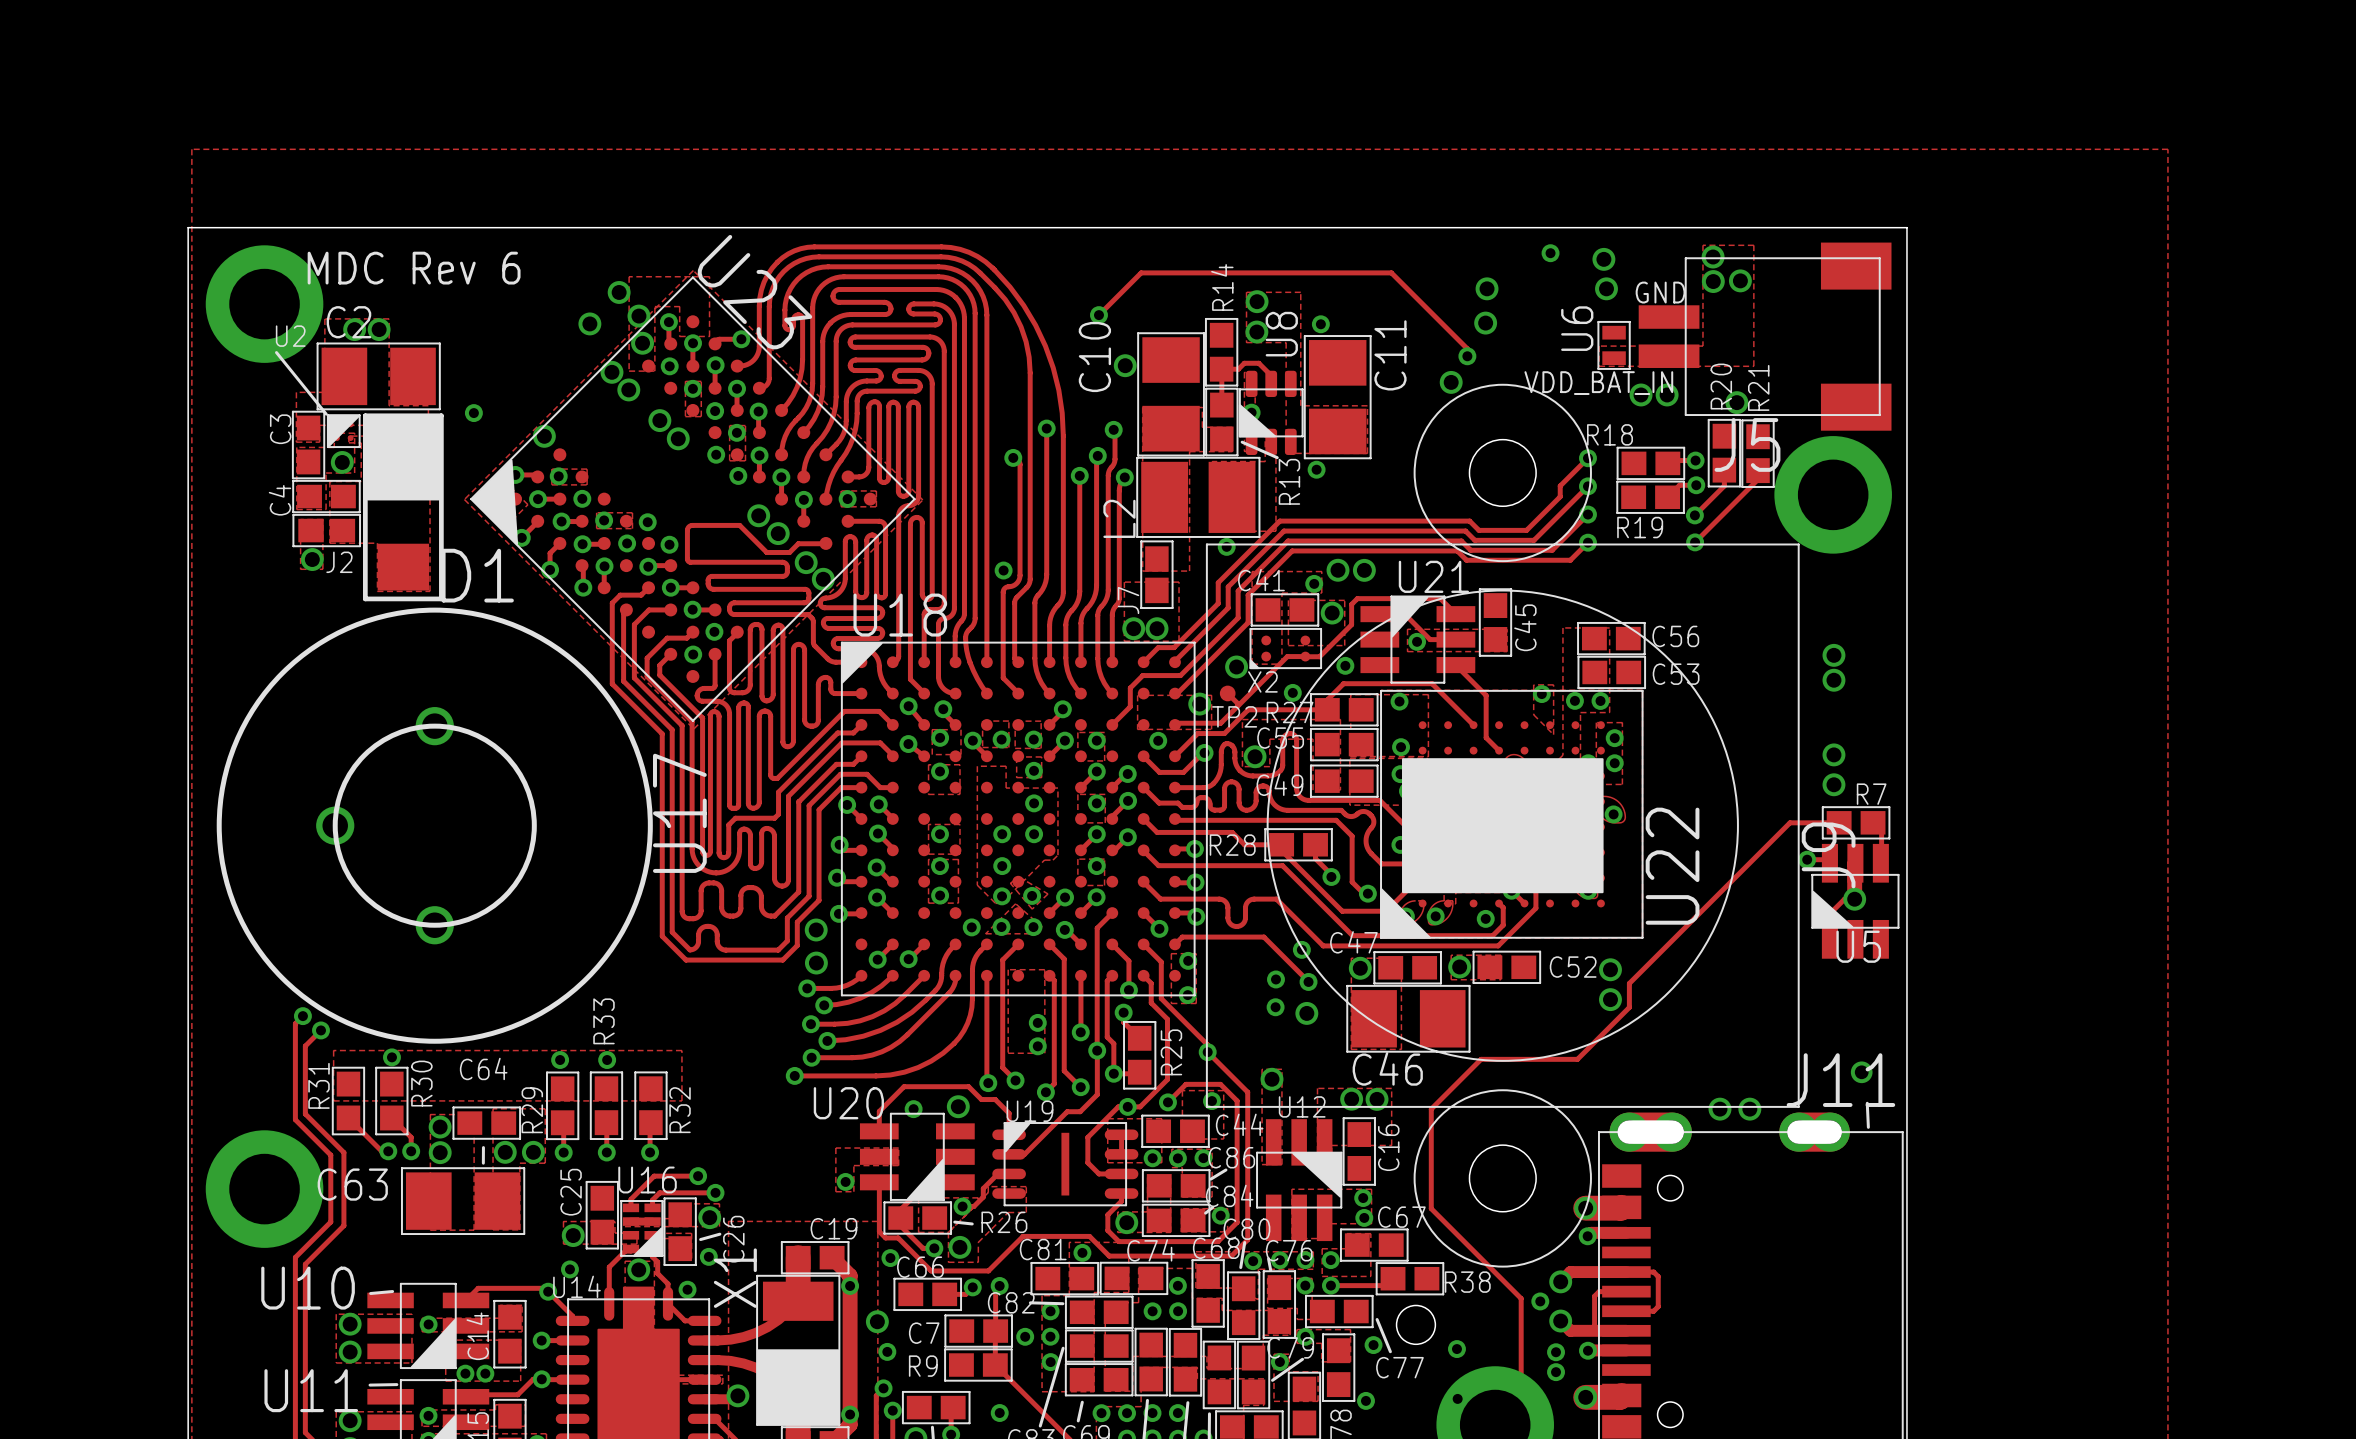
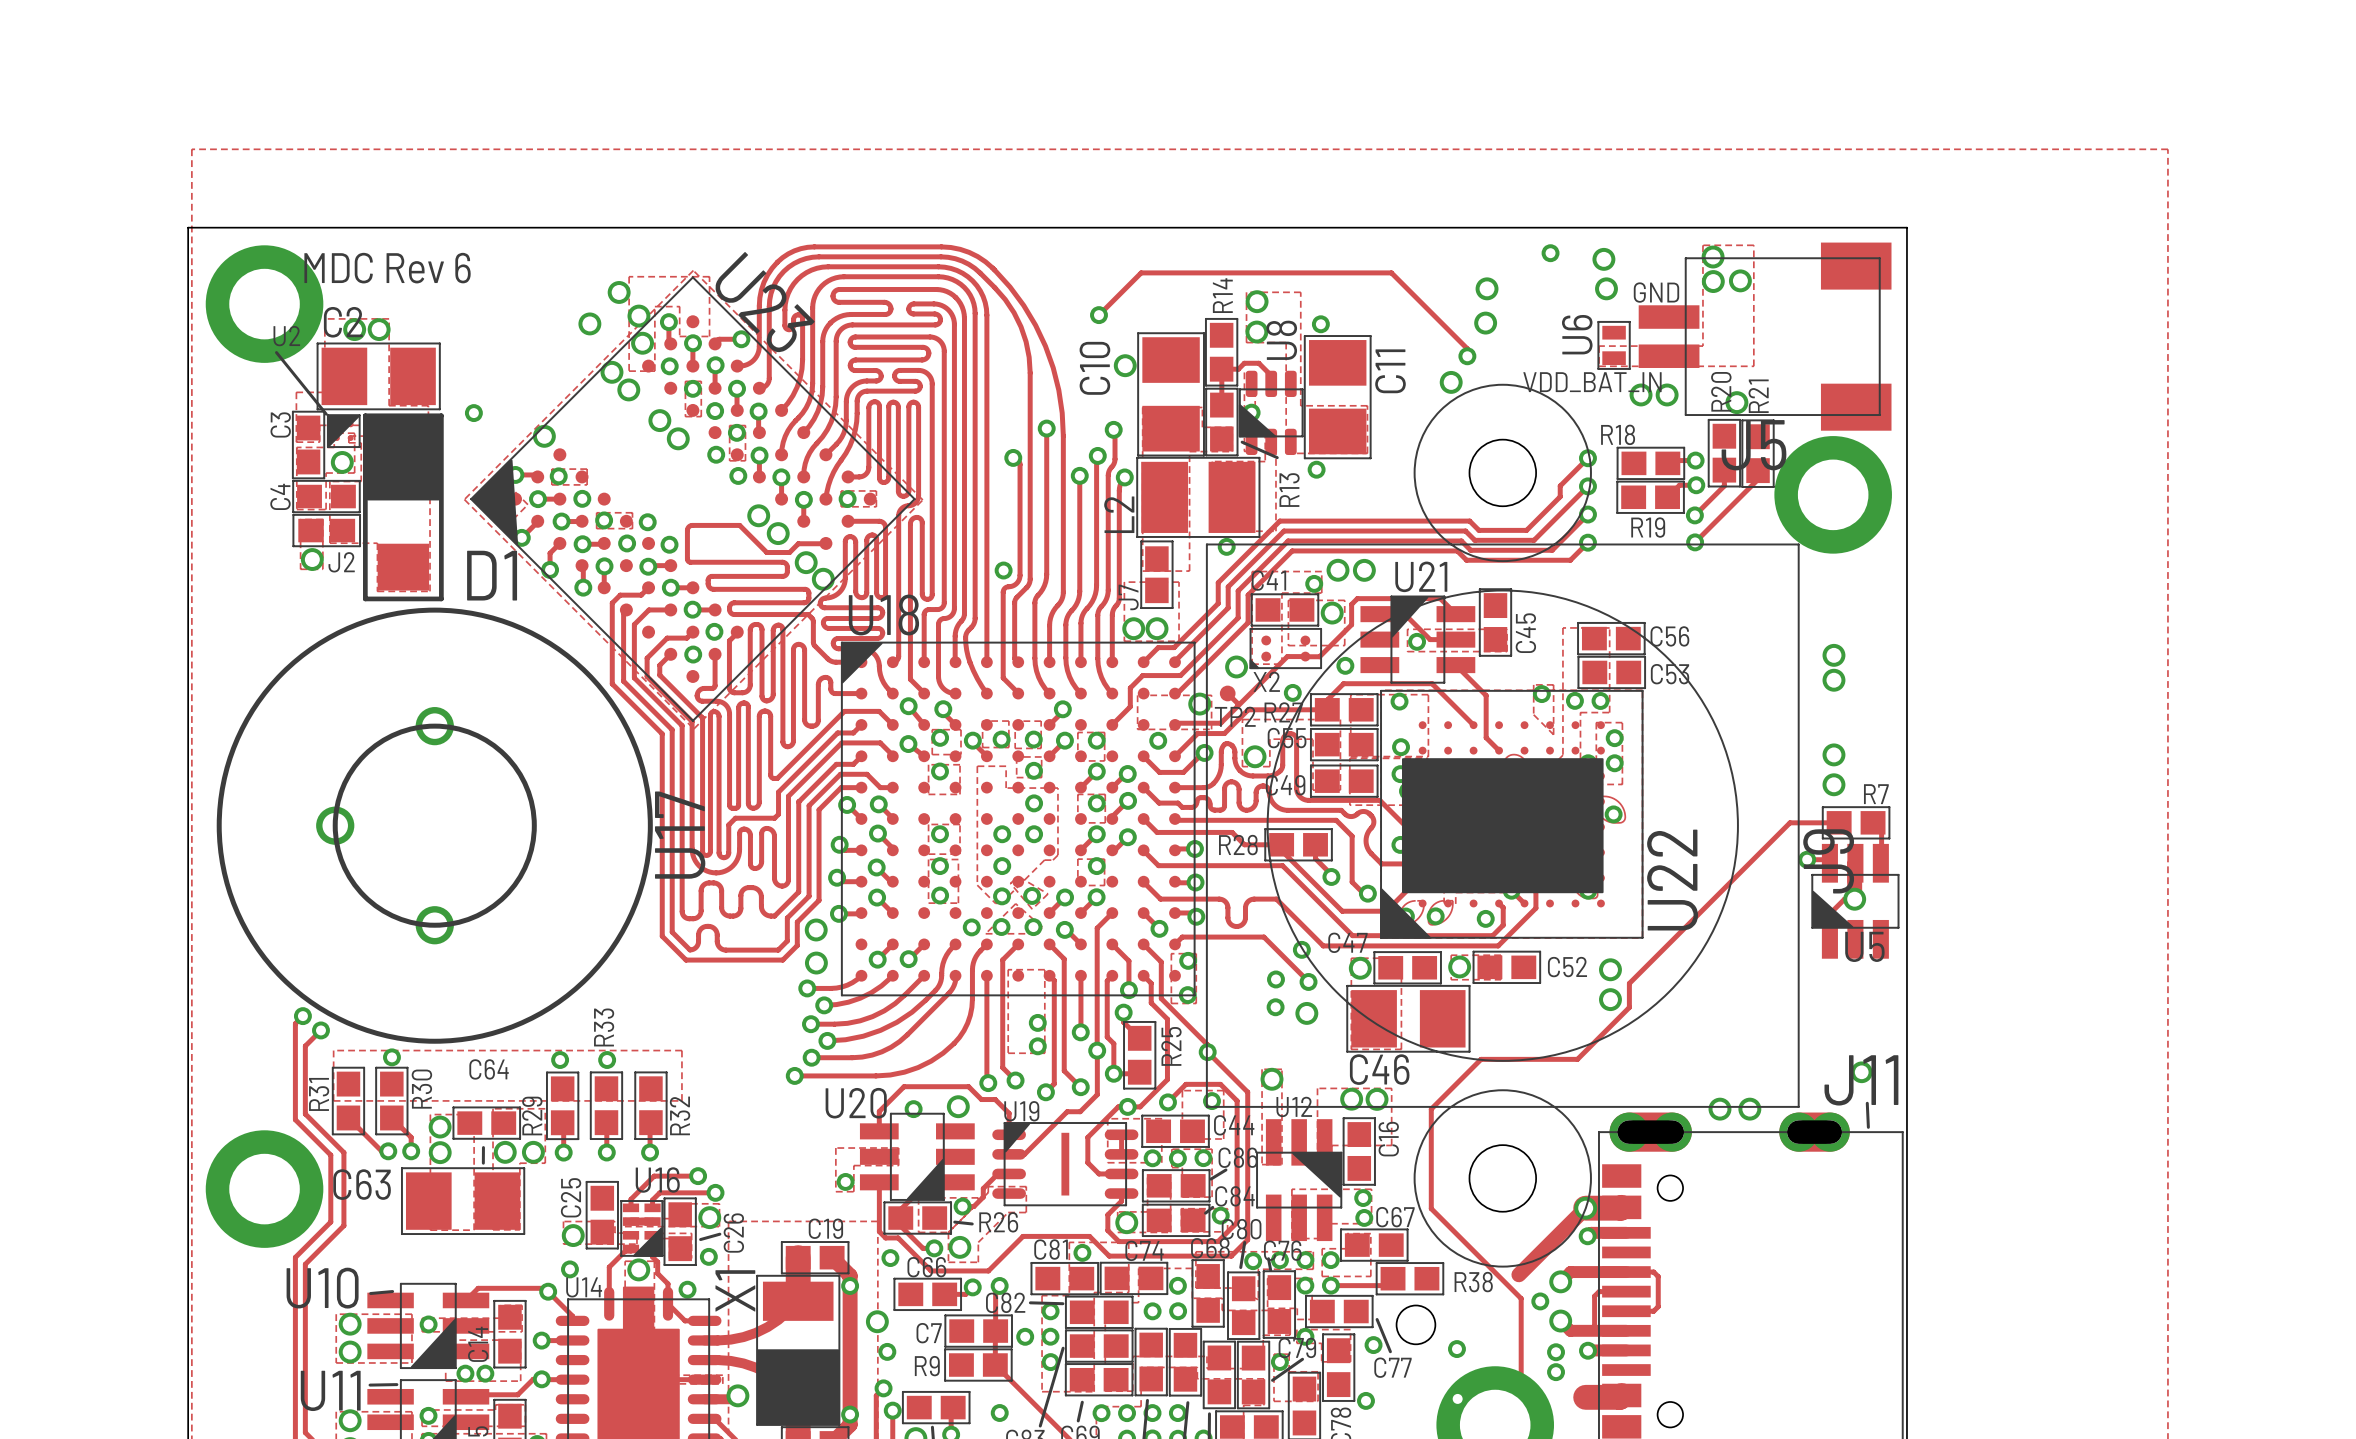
track: none -> (1585, 1208) (1518, 1274)
via: (1585, 1397) -> none

